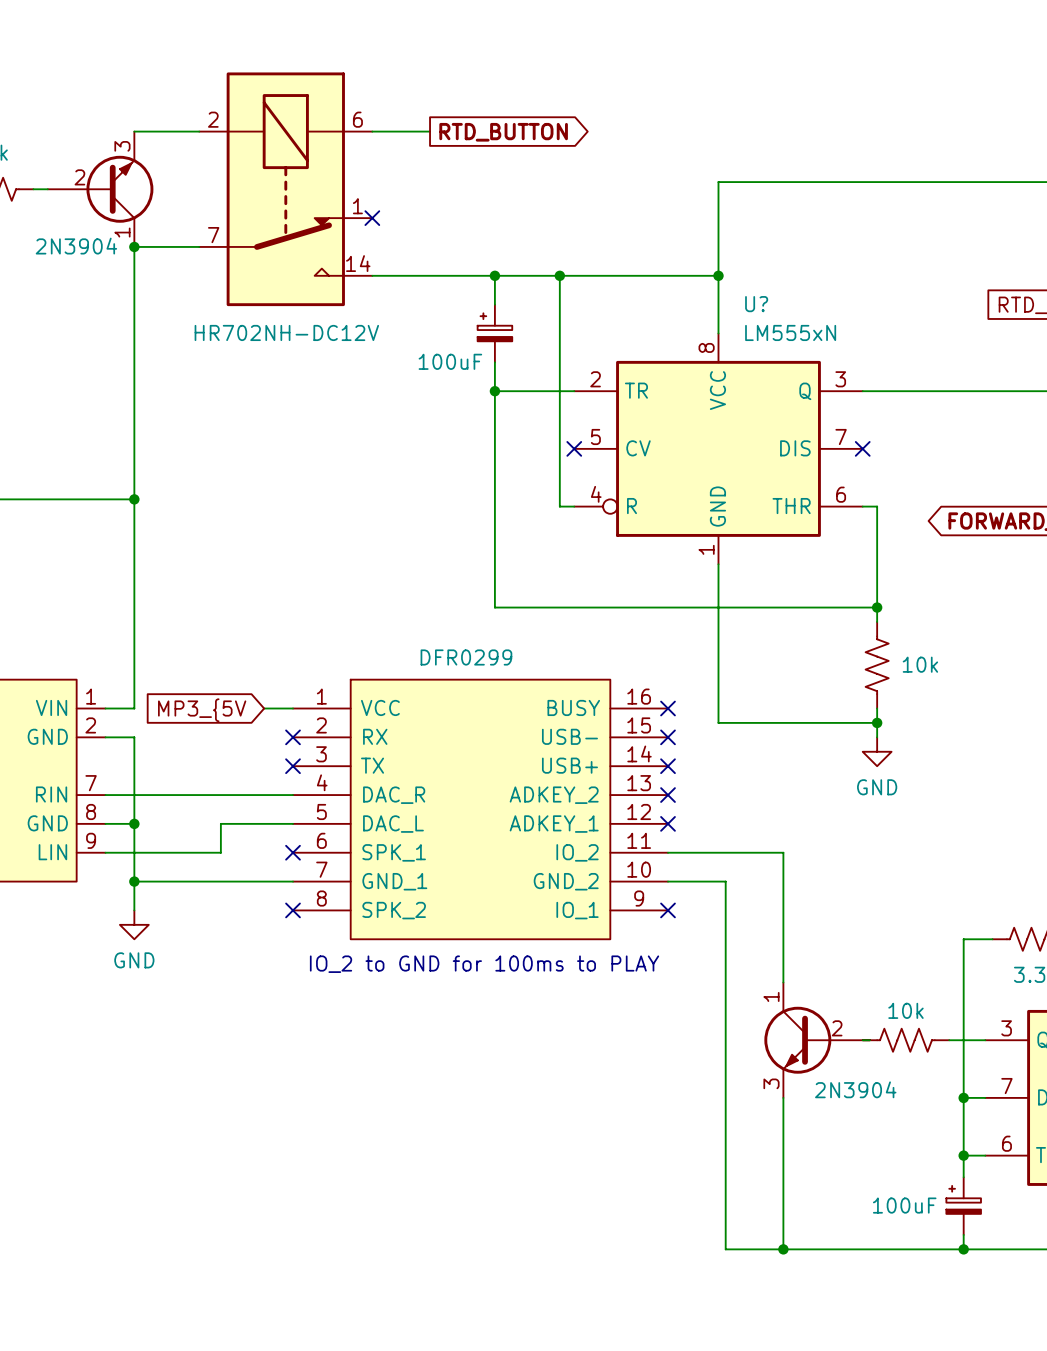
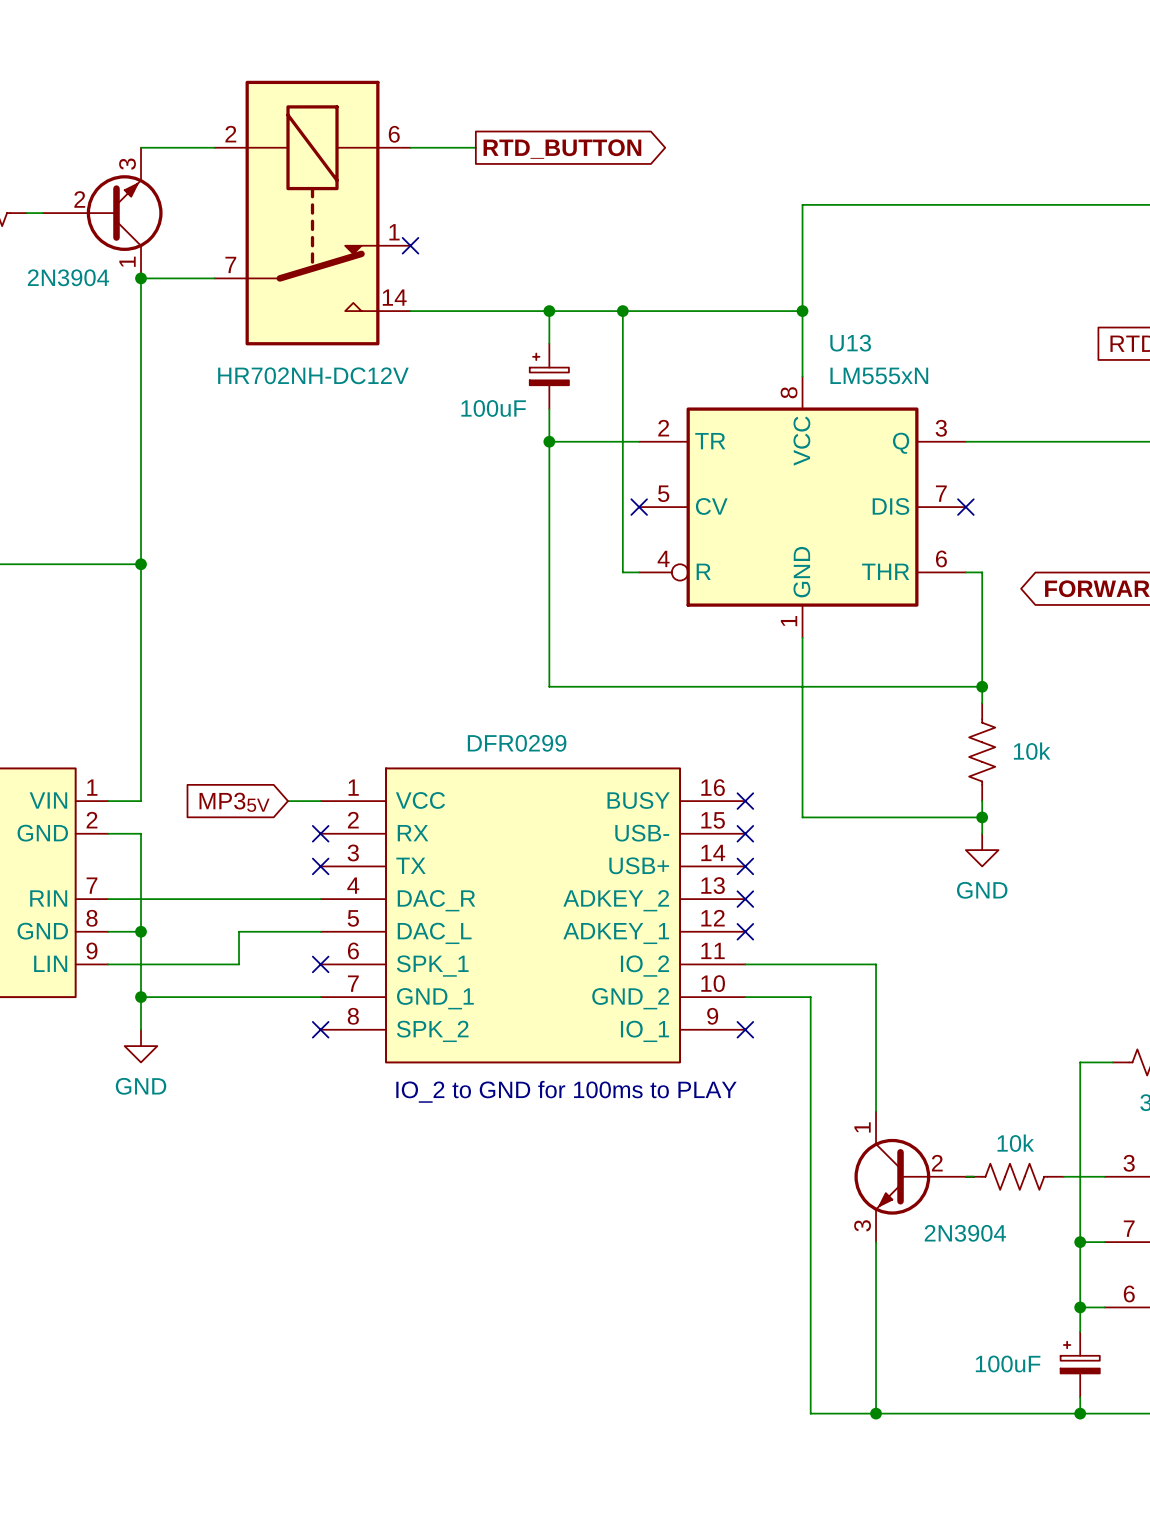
U? name: U? (756, 304) -> U13 (850, 343)
global label: MP3_{5V (202, 710) -> MP35V (234, 802)

